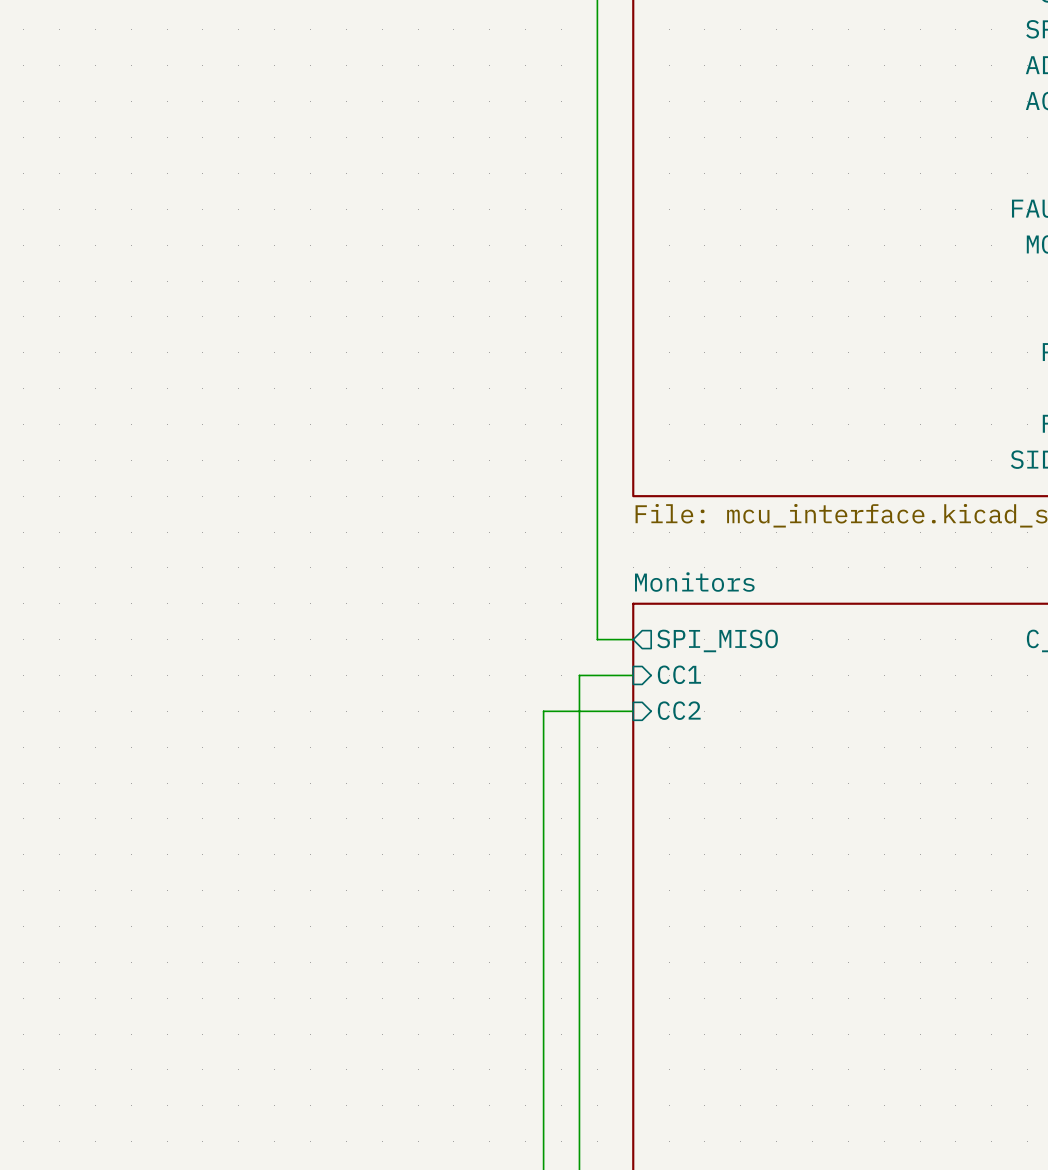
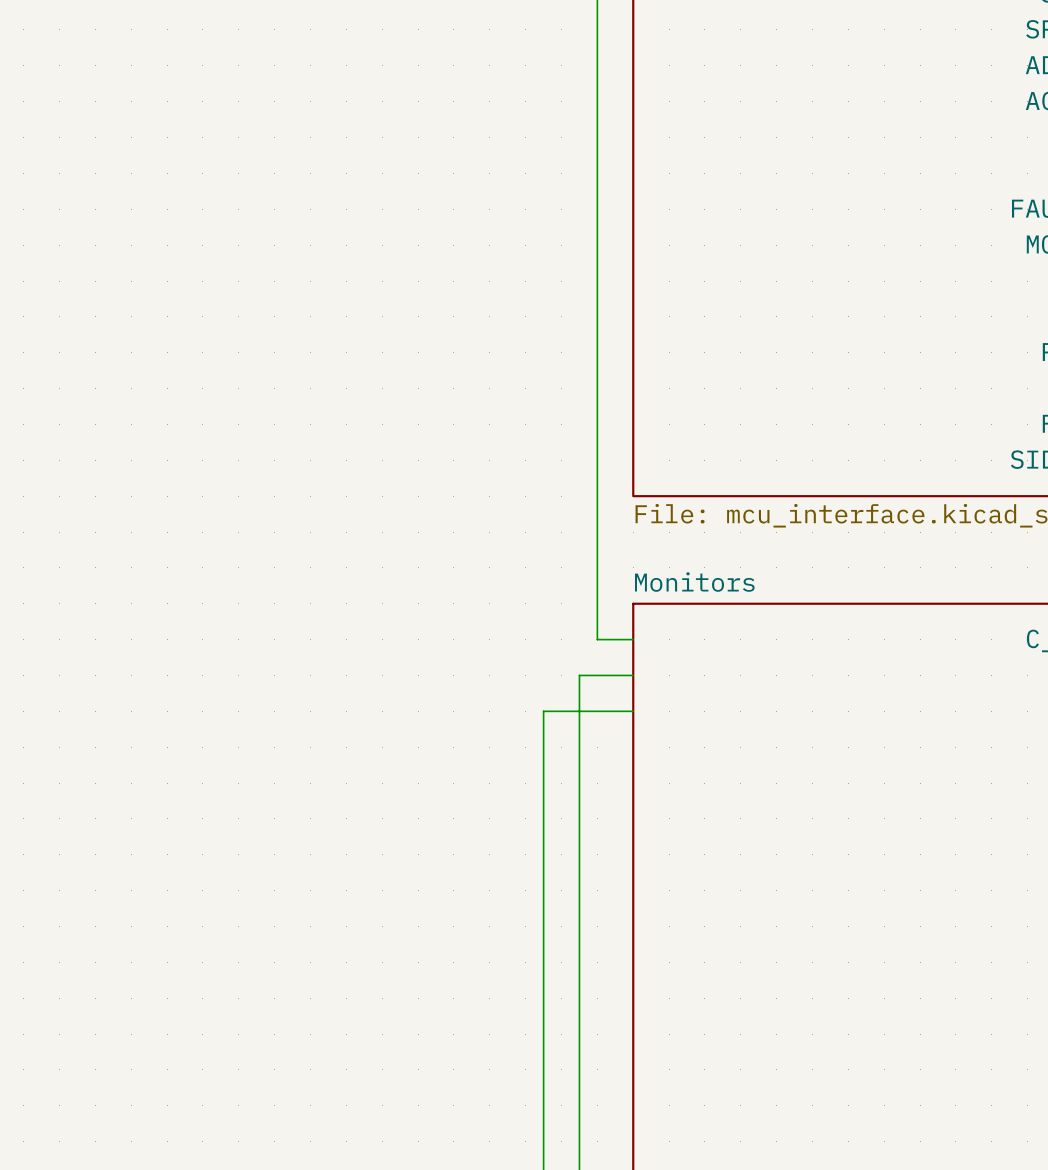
sheet pin: SPI_MISO (717, 640) -> none
sheet pin: CC1 (679, 674) -> none
sheet pin: CC2 (679, 710) -> none

